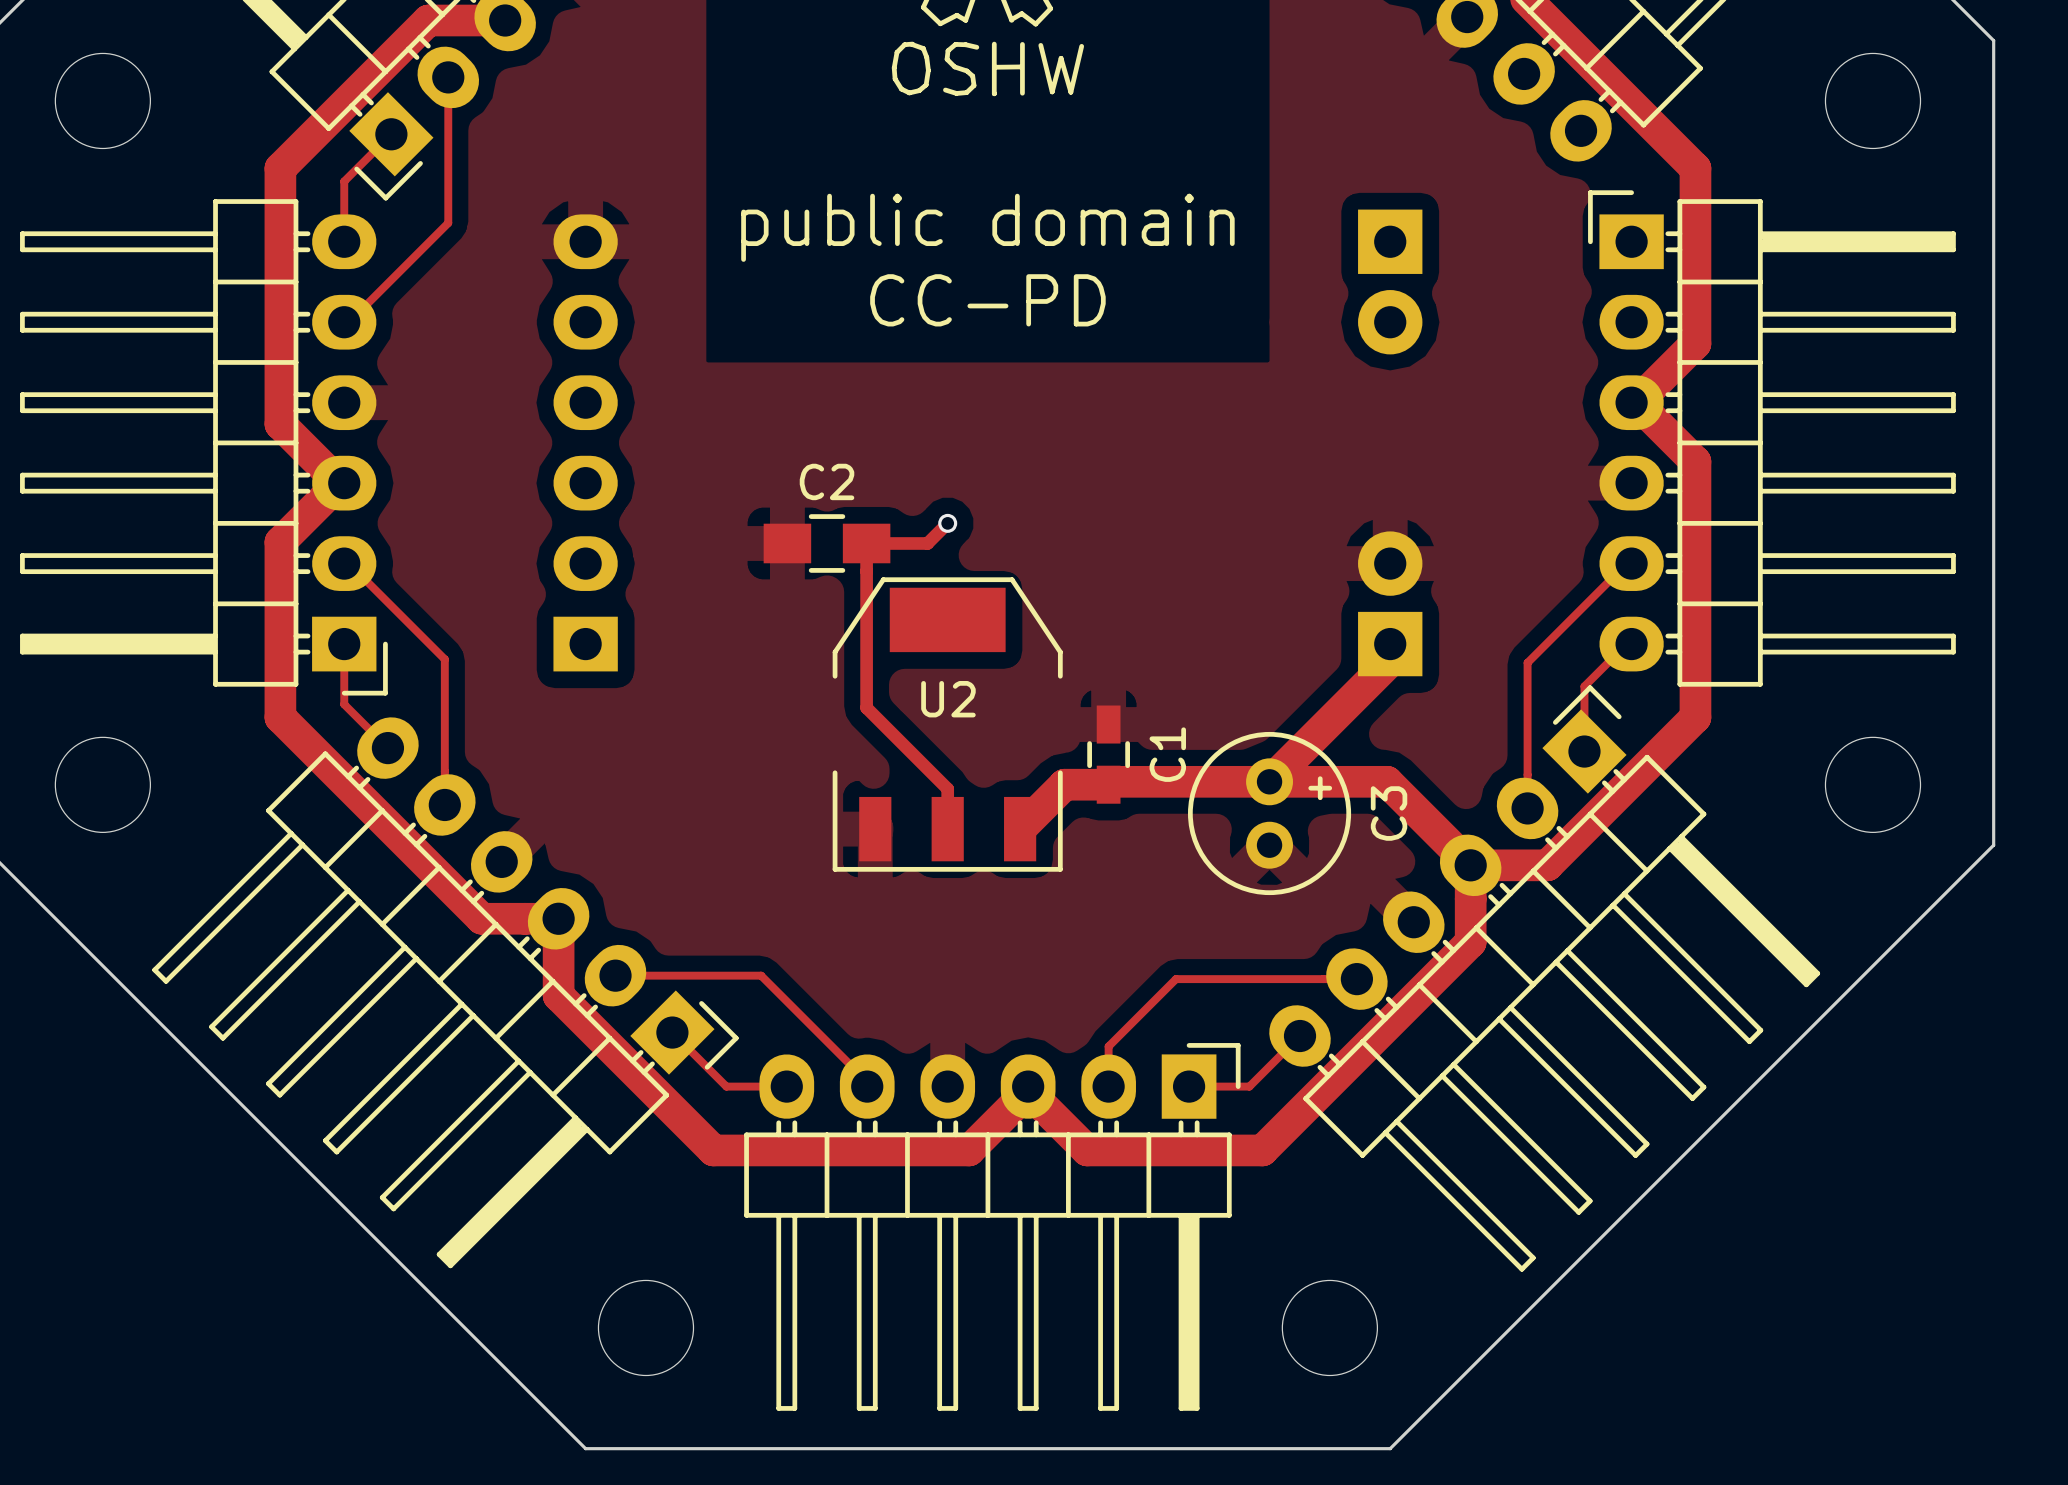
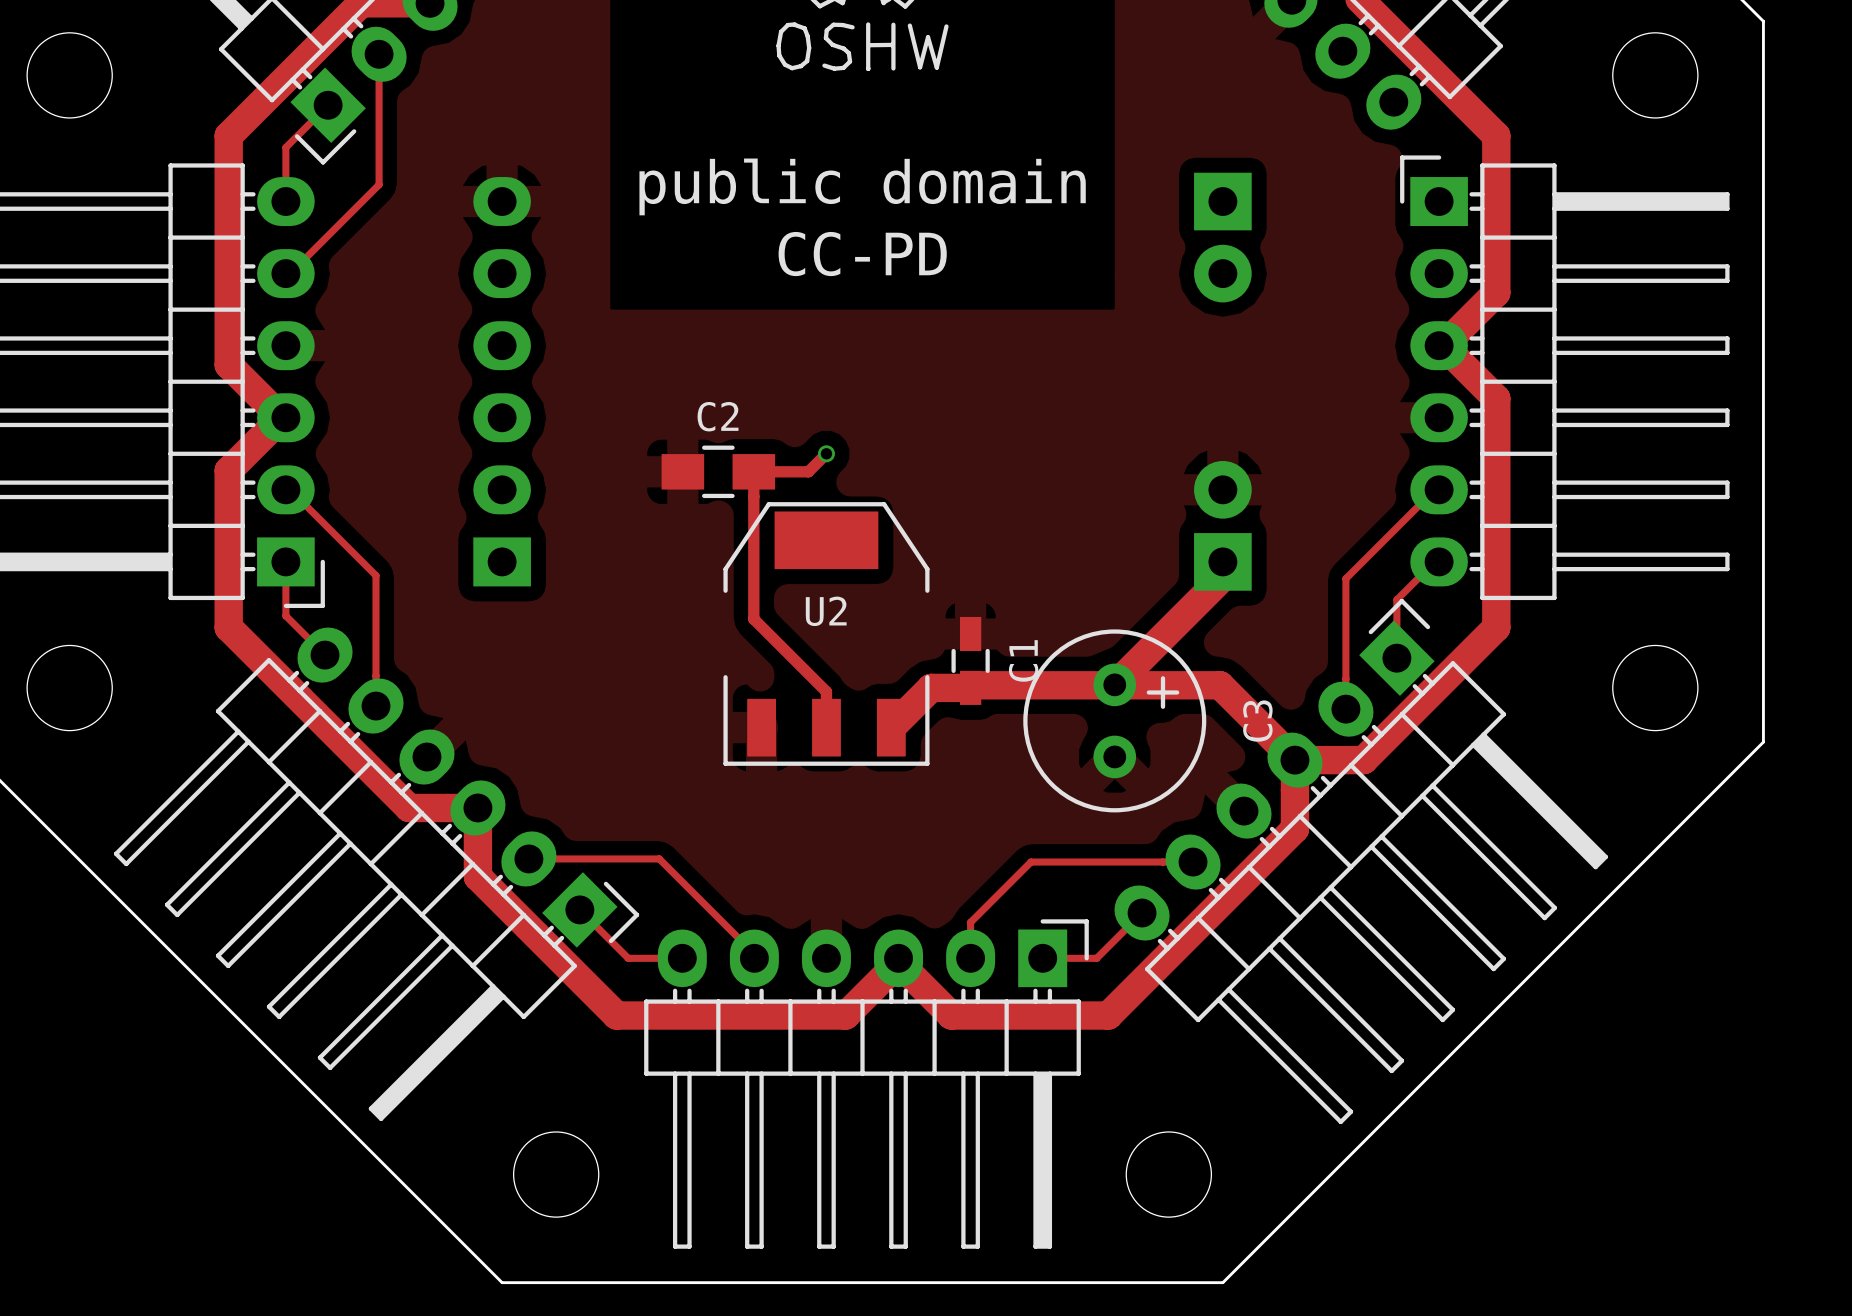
C3 footprint: [1187, 731, 1352, 896] -> [1023, 629, 1207, 813]
C3 name position: C3 (1389, 813) -> C3 (1257, 721)

